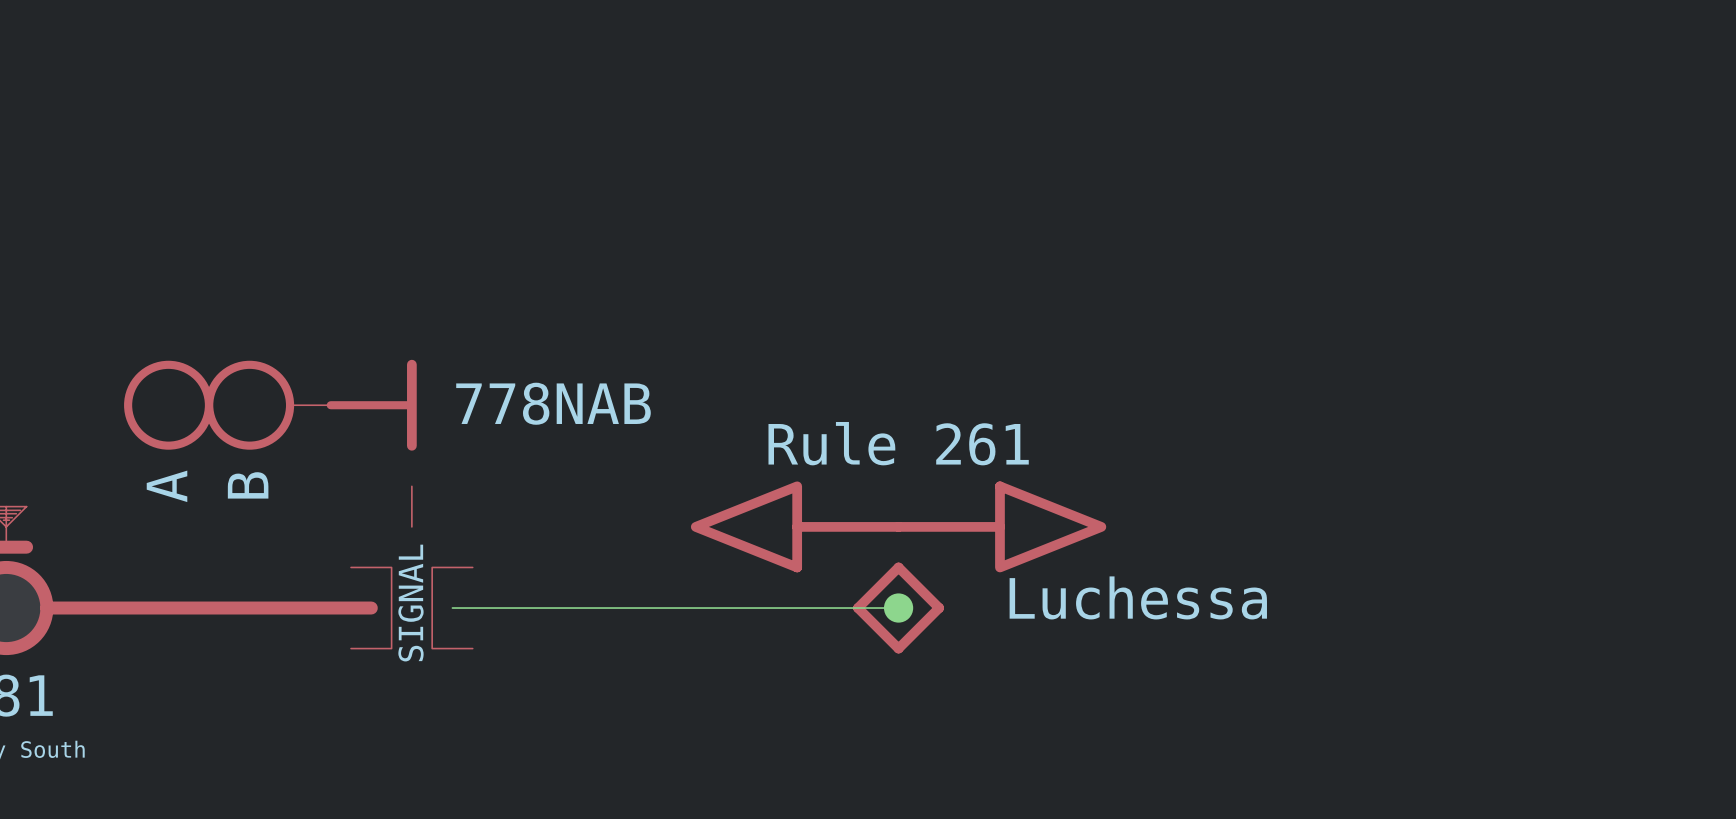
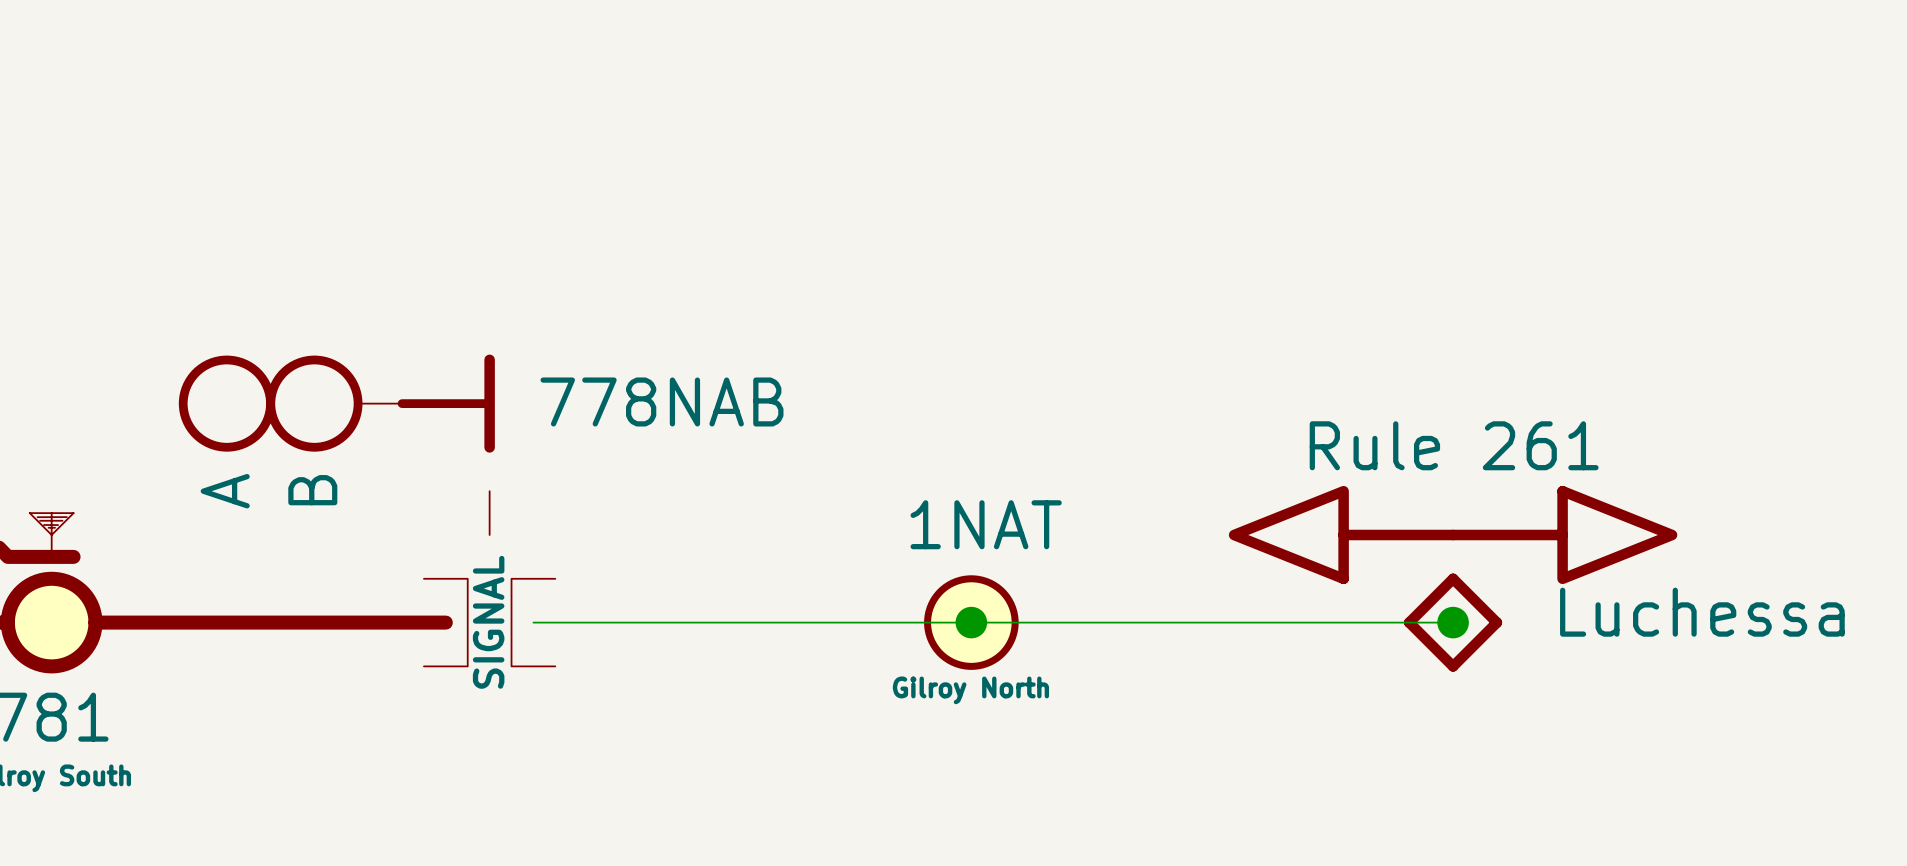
part position: (898, 526) -> (1453, 535)
part: none -> 1NAT (971, 622)
wire: none -> (1015, 622) (1453, 622)
junction position: (898, 608) -> (971, 622)
part position: (898, 608) -> (1453, 622)
junction: none -> (1453, 622)

